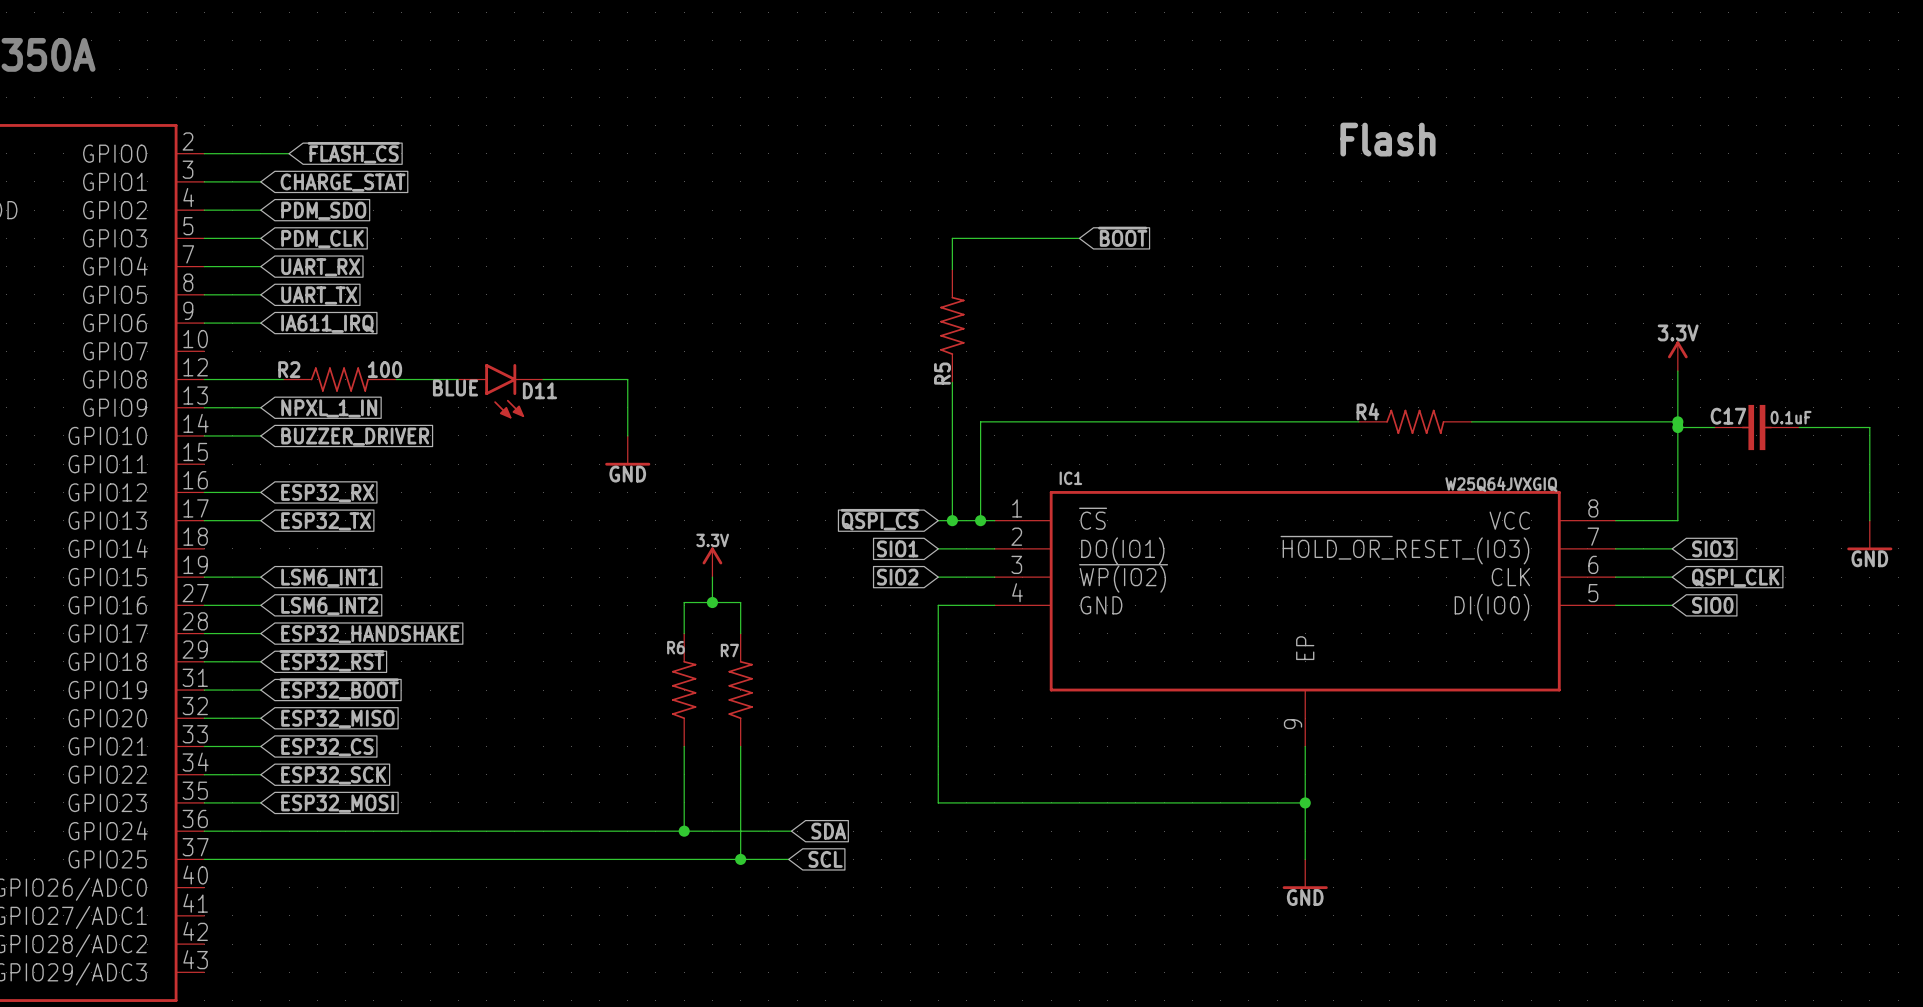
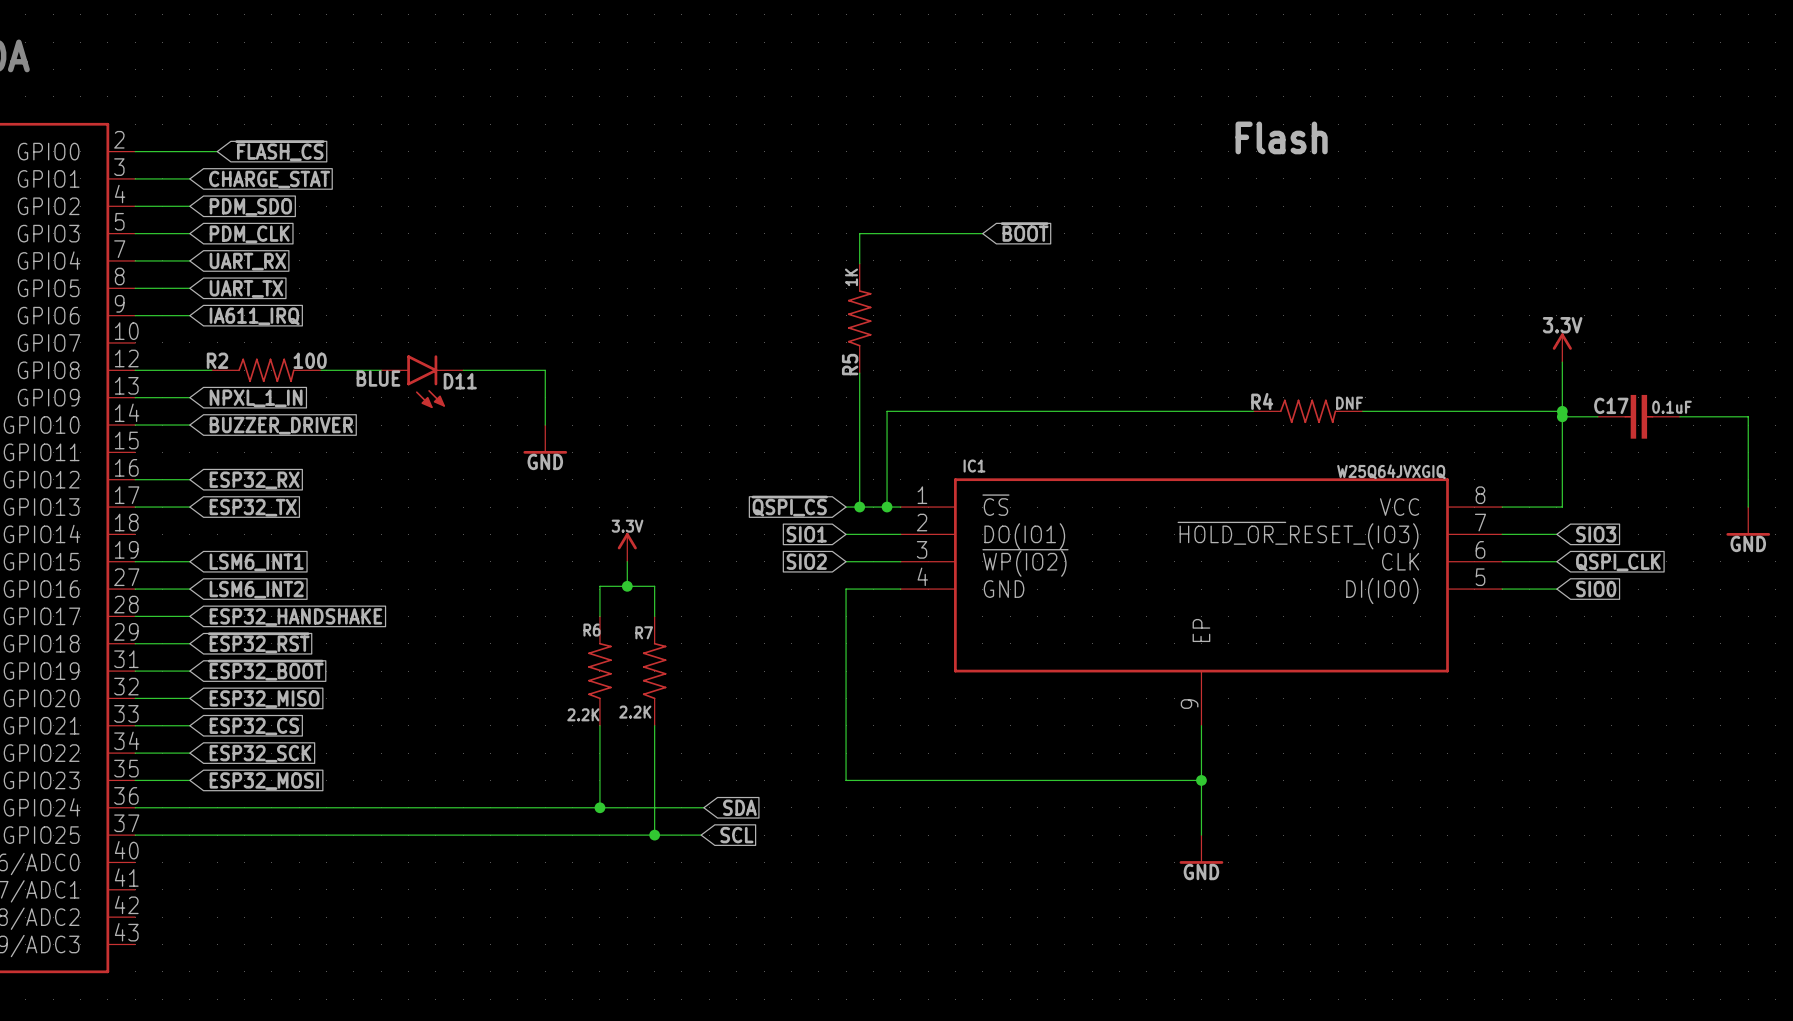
R5 value: none -> 1K (851, 277)
R4 value: none -> DNF (1349, 403)
R7 value: none -> 2.2K (635, 712)
R6 value: none -> 2.2K (583, 714)

